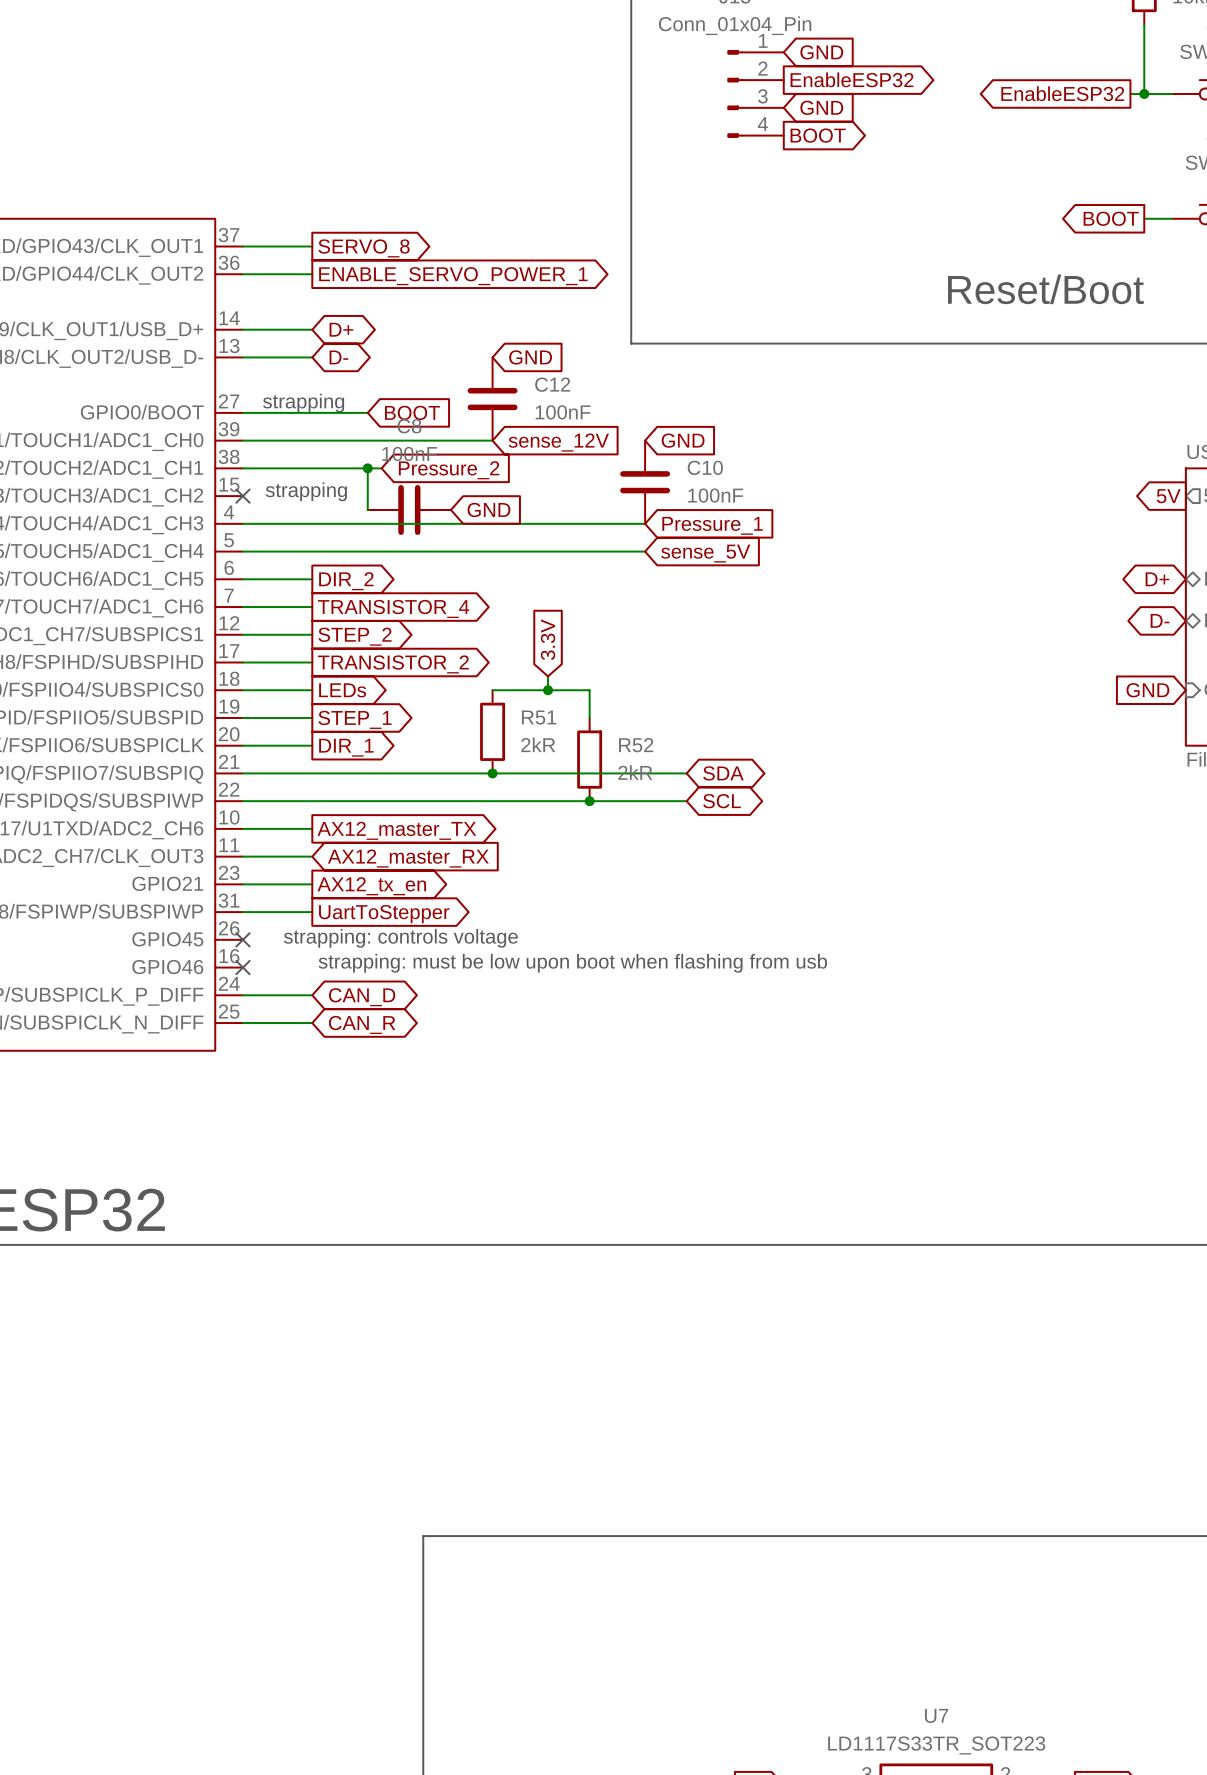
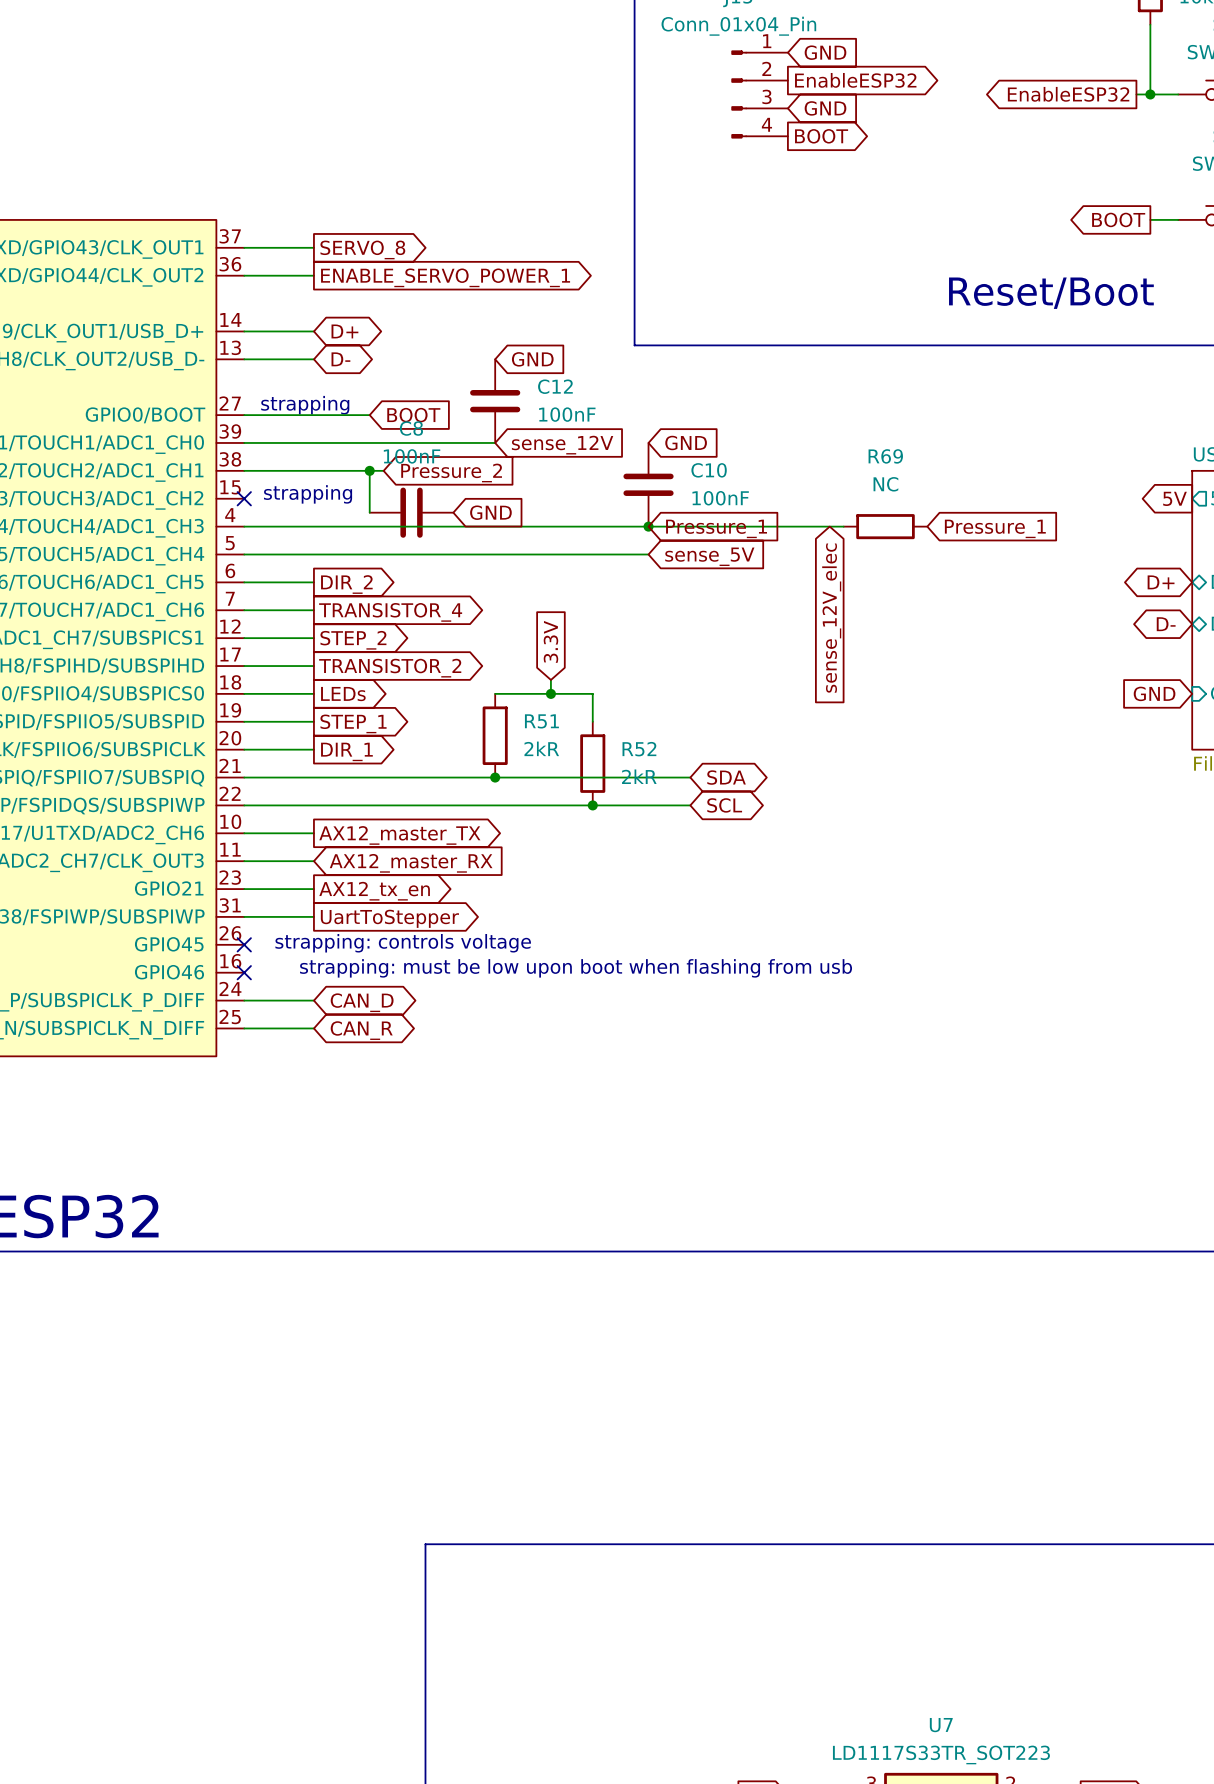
wire: none -> (648, 526) (843, 526)
junction: none -> (648, 526)
R69: none -> NC (885, 526)
global label: none -> Pressure_1 (995, 528)
global label: none -> sense_12V_elec (831, 618)

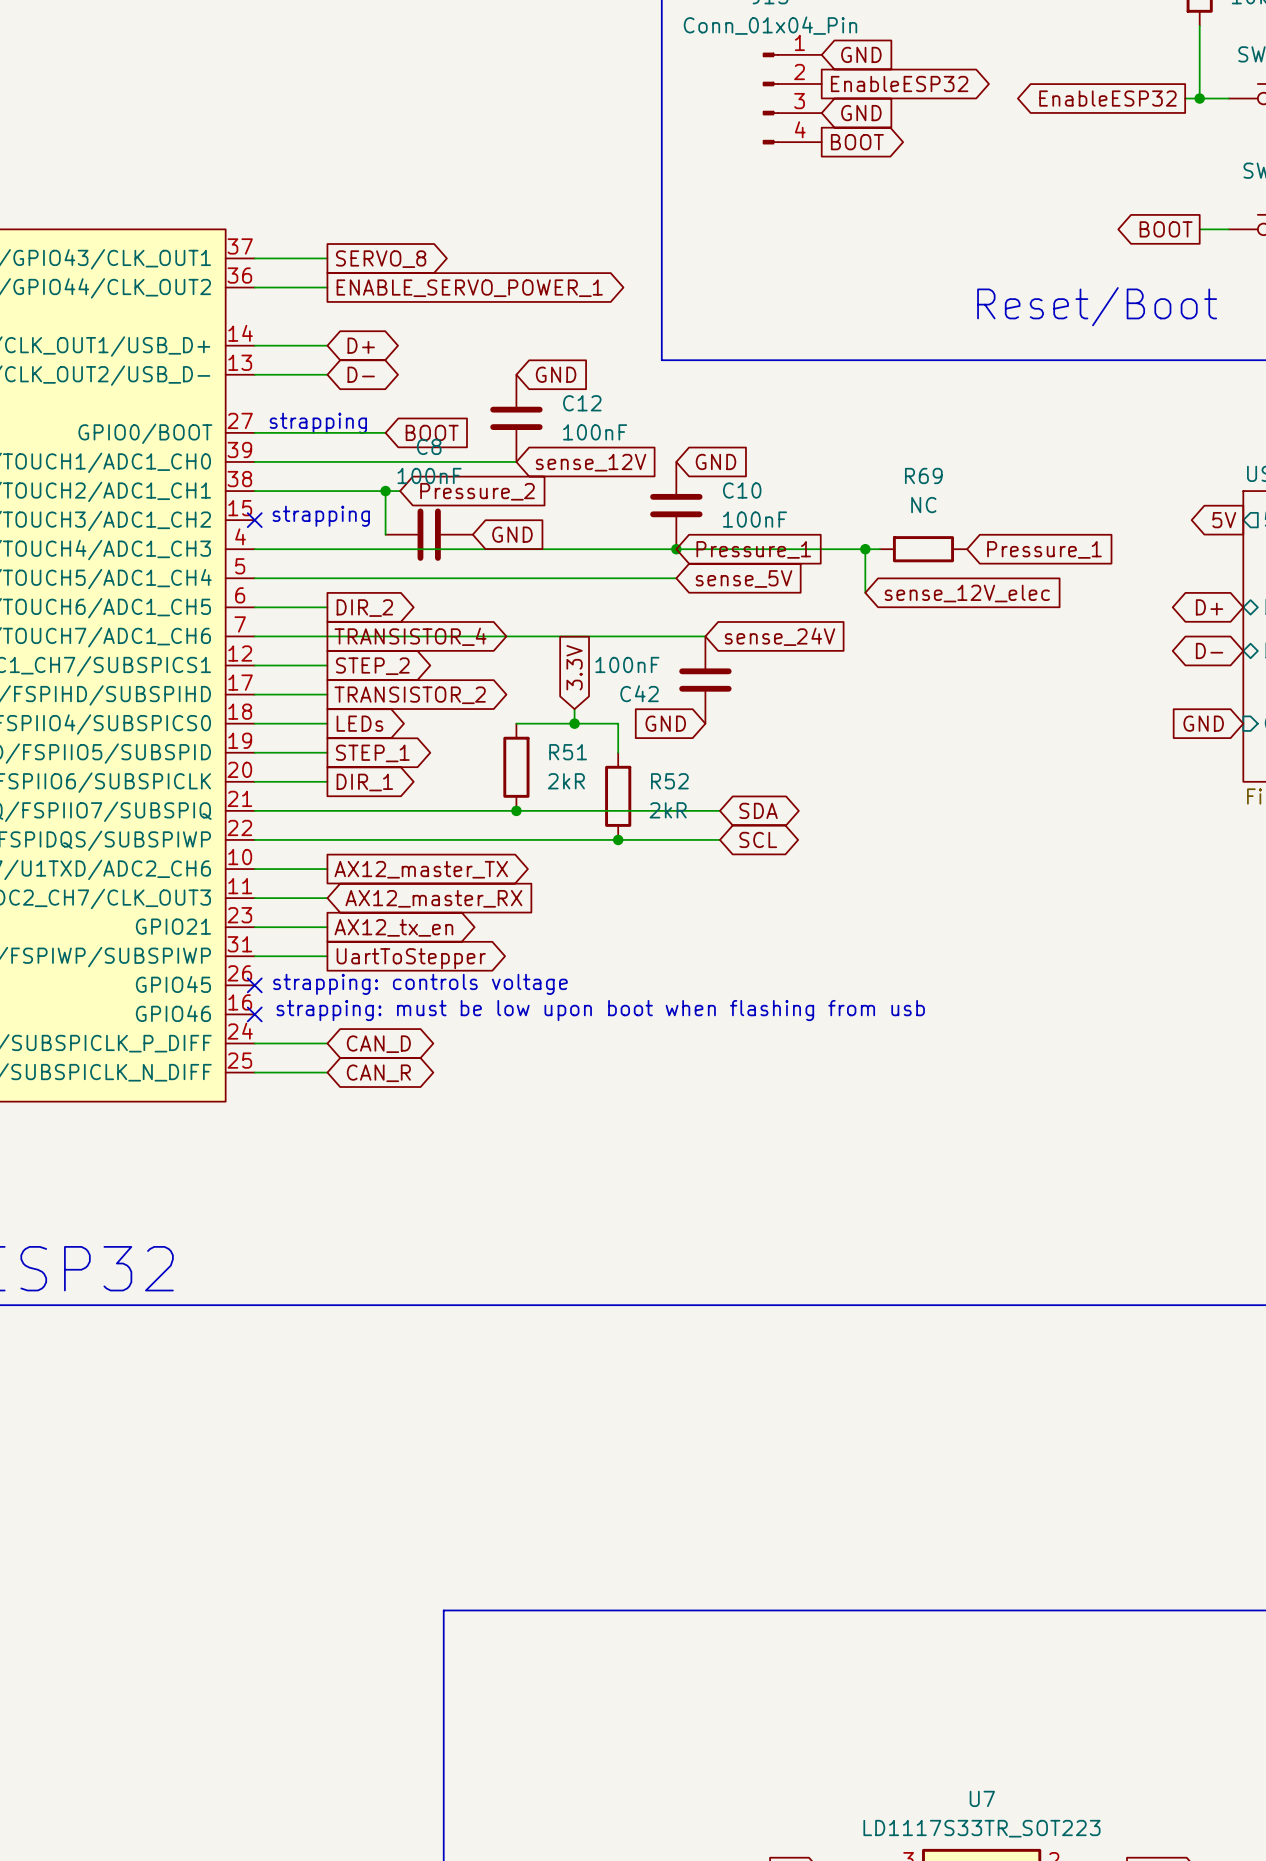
wire: none -> (865, 549) (865, 592)
junction: none -> (865, 549)
wire: none -> (327, 636) (705, 636)
global label: none -> sense_24V (780, 636)
global label rotation: 0° (831, 618) -> 90° counterclockwise (967, 593)
C42: none -> 100nF (705, 680)
global label: none -> GND (665, 723)

